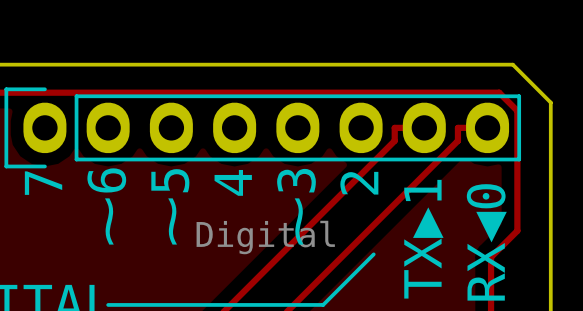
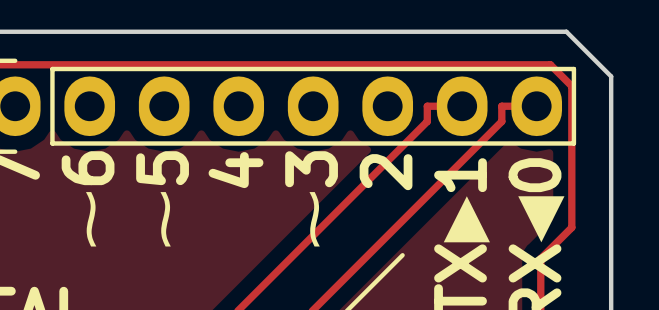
part value: Digital (265, 237) -> none

